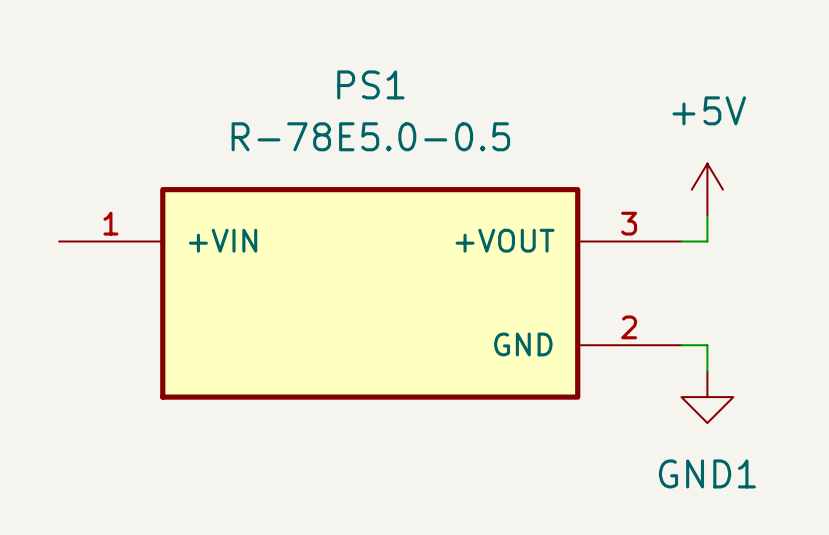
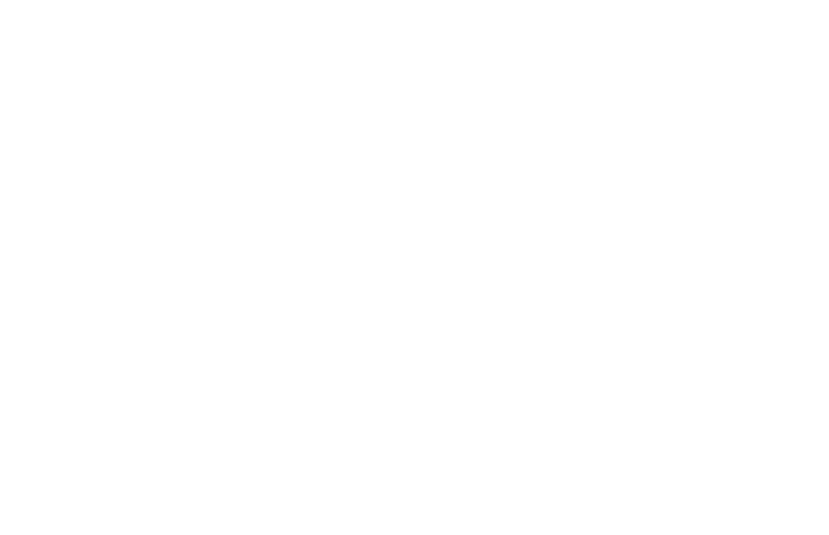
power symbol: +5V (707, 189) -> none
wire: (707, 215) (707, 241) (681, 241) -> none
PS1: R-78E5.0-0.5 (370, 293) -> none
wire: (681, 345) (707, 345) (707, 371) -> none
power symbol: GND1 (707, 397) -> none

